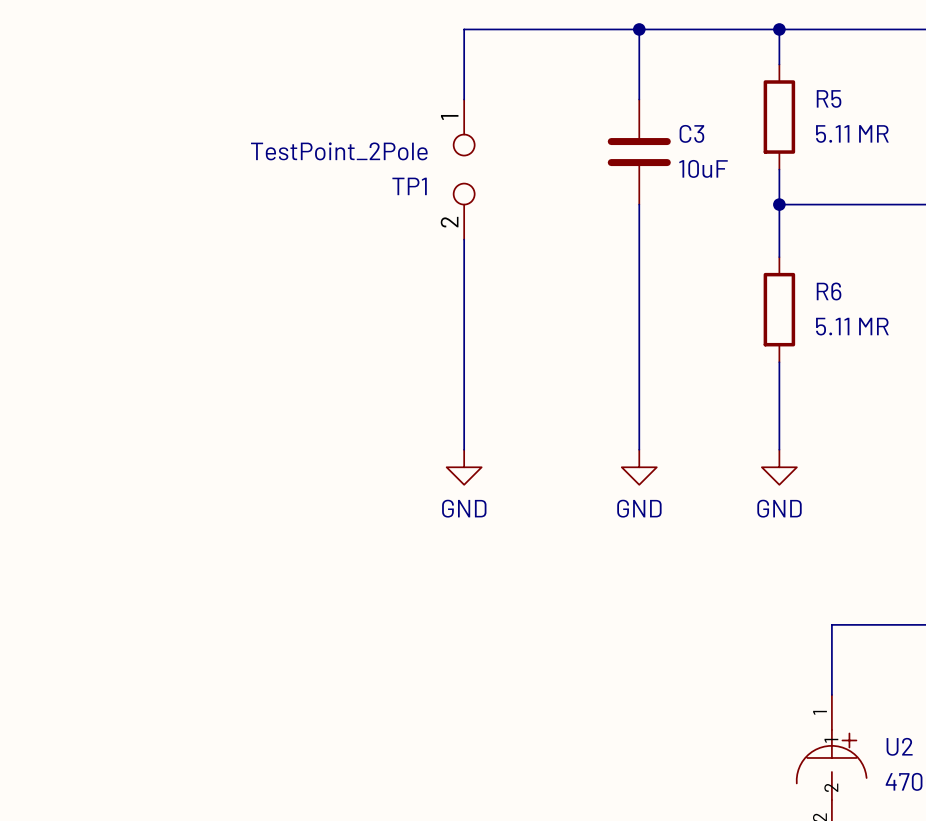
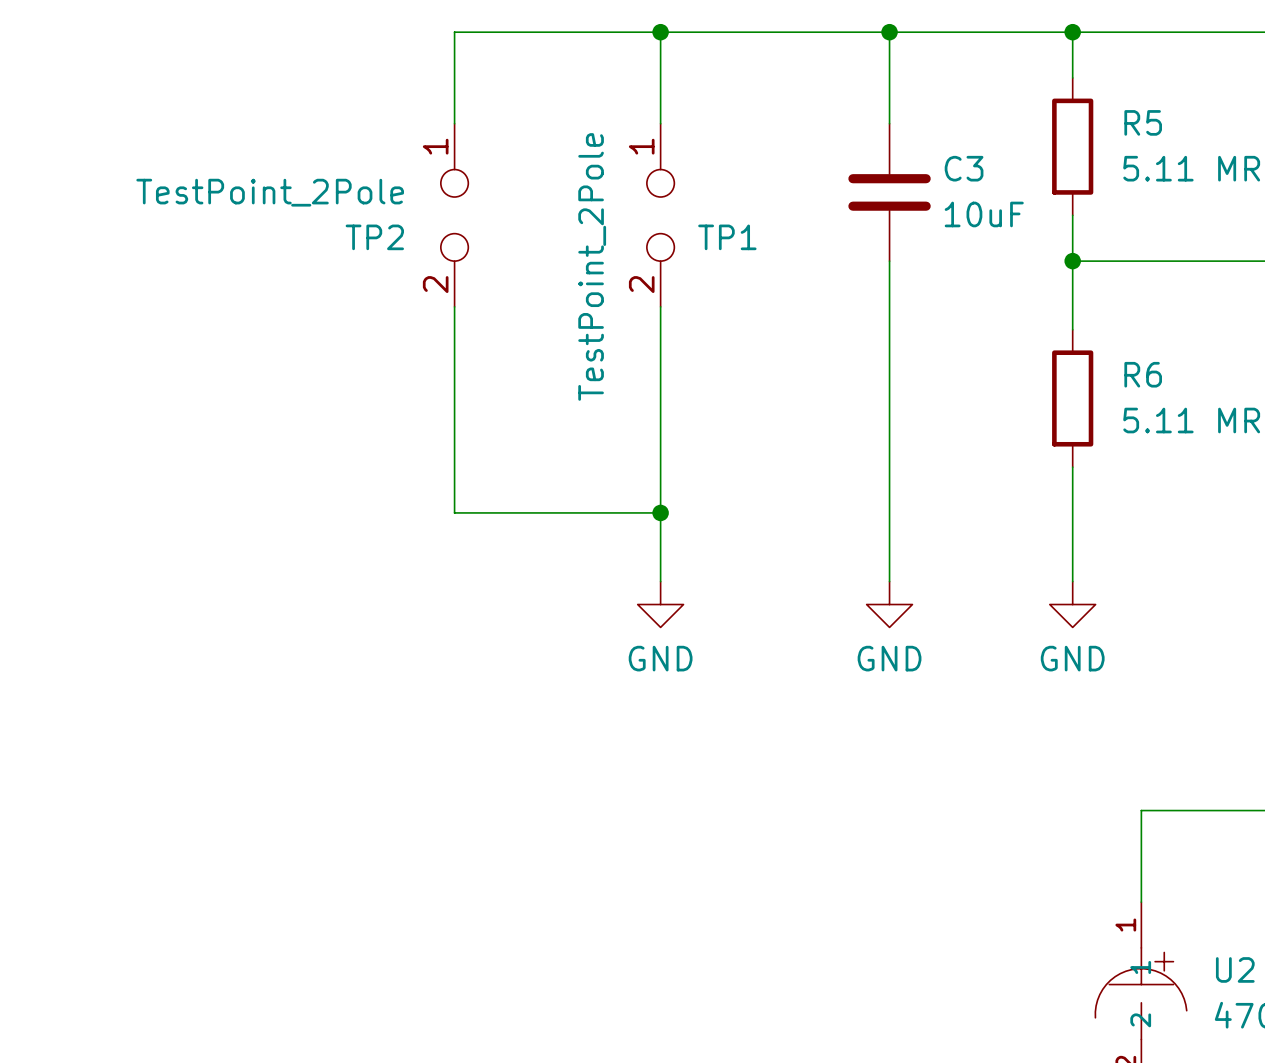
wire: none -> (660, 32) (454, 32) (454, 123)
junction: none -> (660, 32)
TP1 value rotation: 0° (339, 151) -> 90° counterclockwise (592, 266)
TP2: none -> TestPoint_2Pole (454, 215)
TP1 name position: TP1 (409, 186) -> TP1 (727, 237)
wire: none -> (454, 306) (454, 512) (660, 512)
junction: none -> (660, 512)

